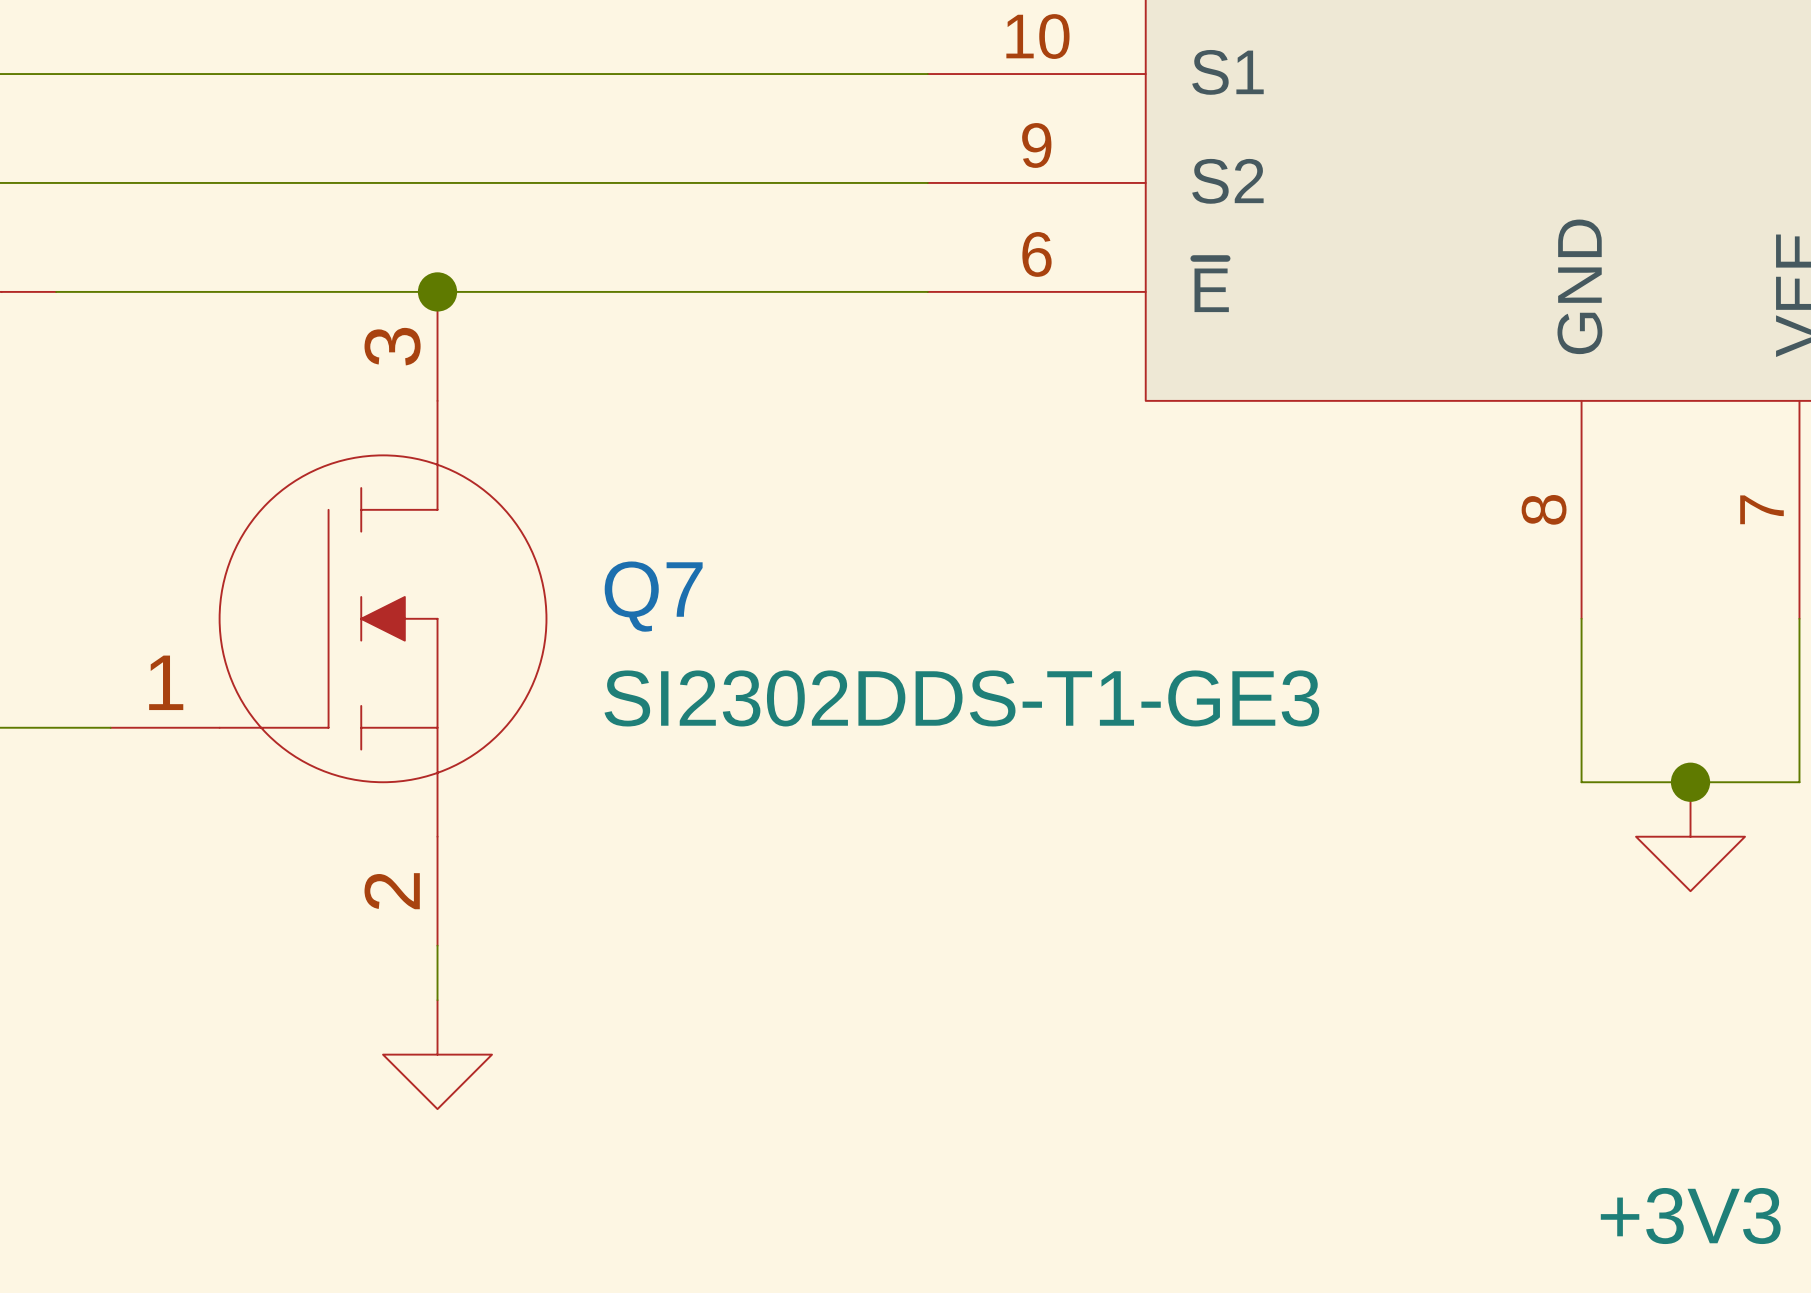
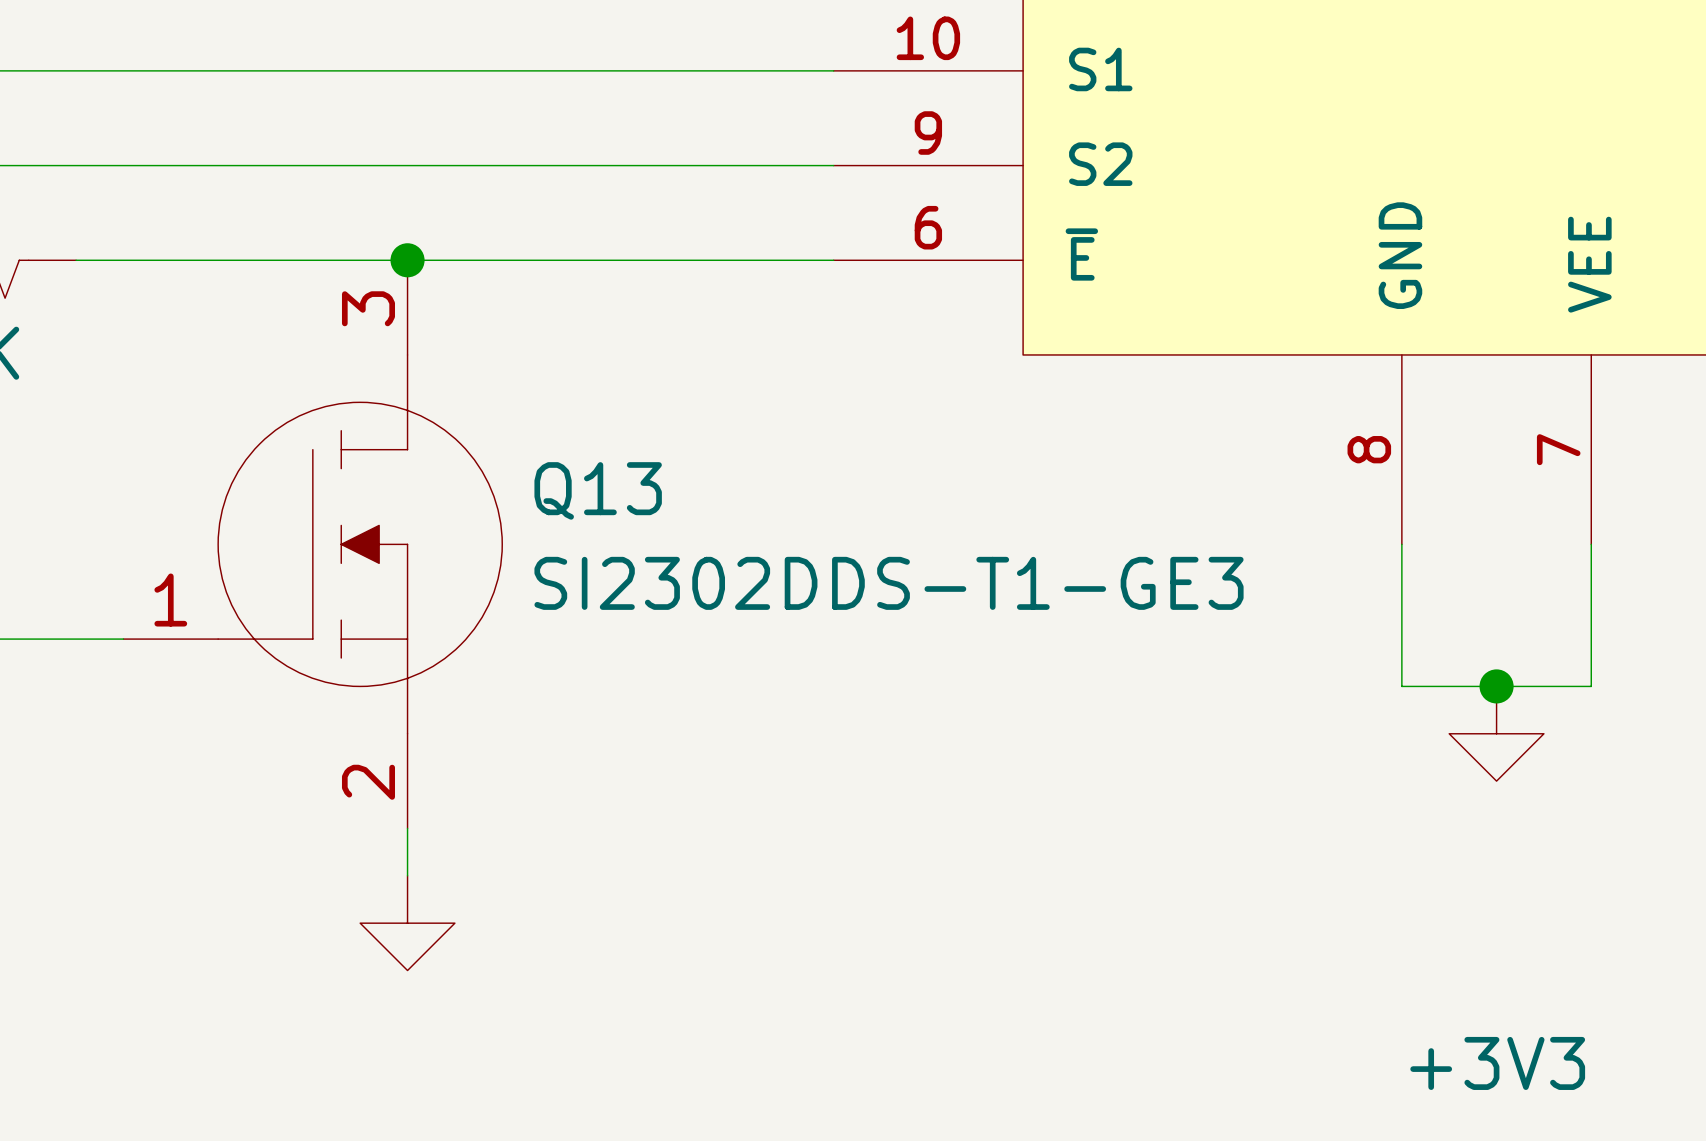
Q7 name: Q7 (653, 596) -> Q13 (598, 490)
Q7 value position: SI2302DDS-T1-GE3 (961, 698) -> SI2302DDS-T1-GE3 (889, 583)

